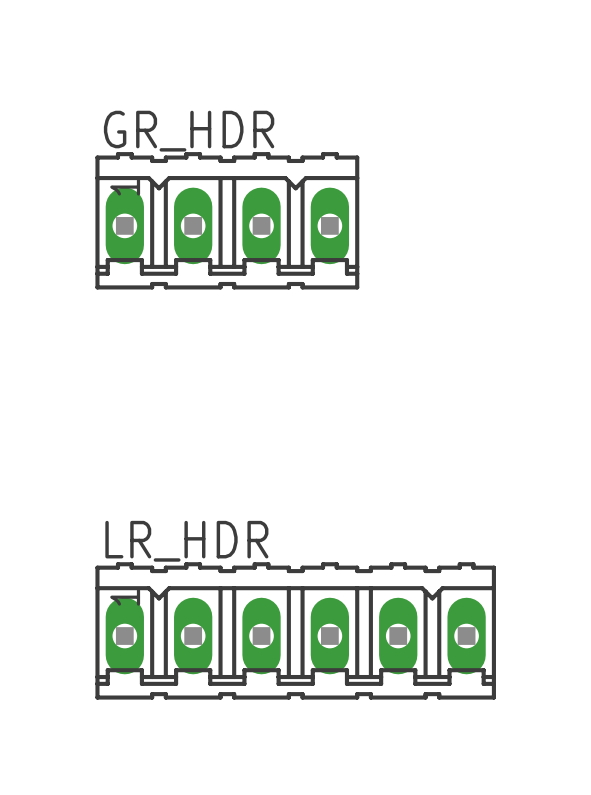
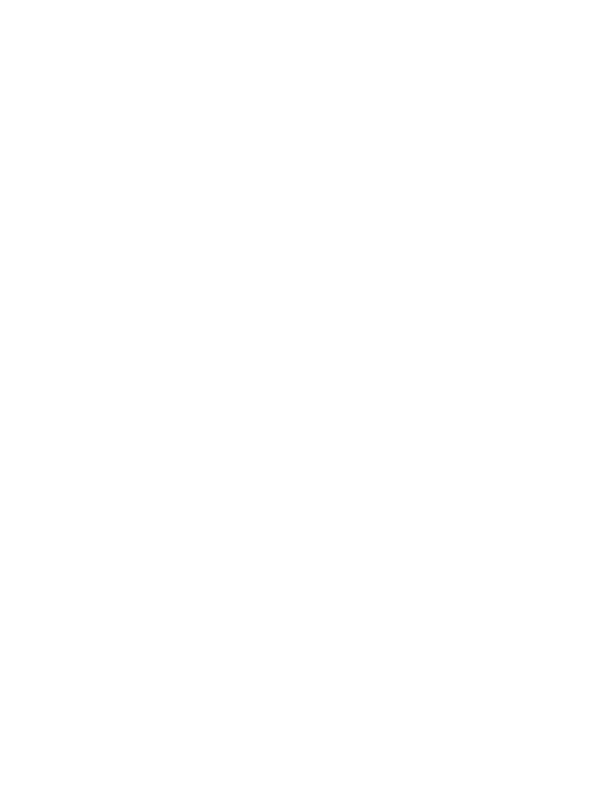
GR_HDR: (227, 220) -> none
LR_HDR: (295, 630) -> none

